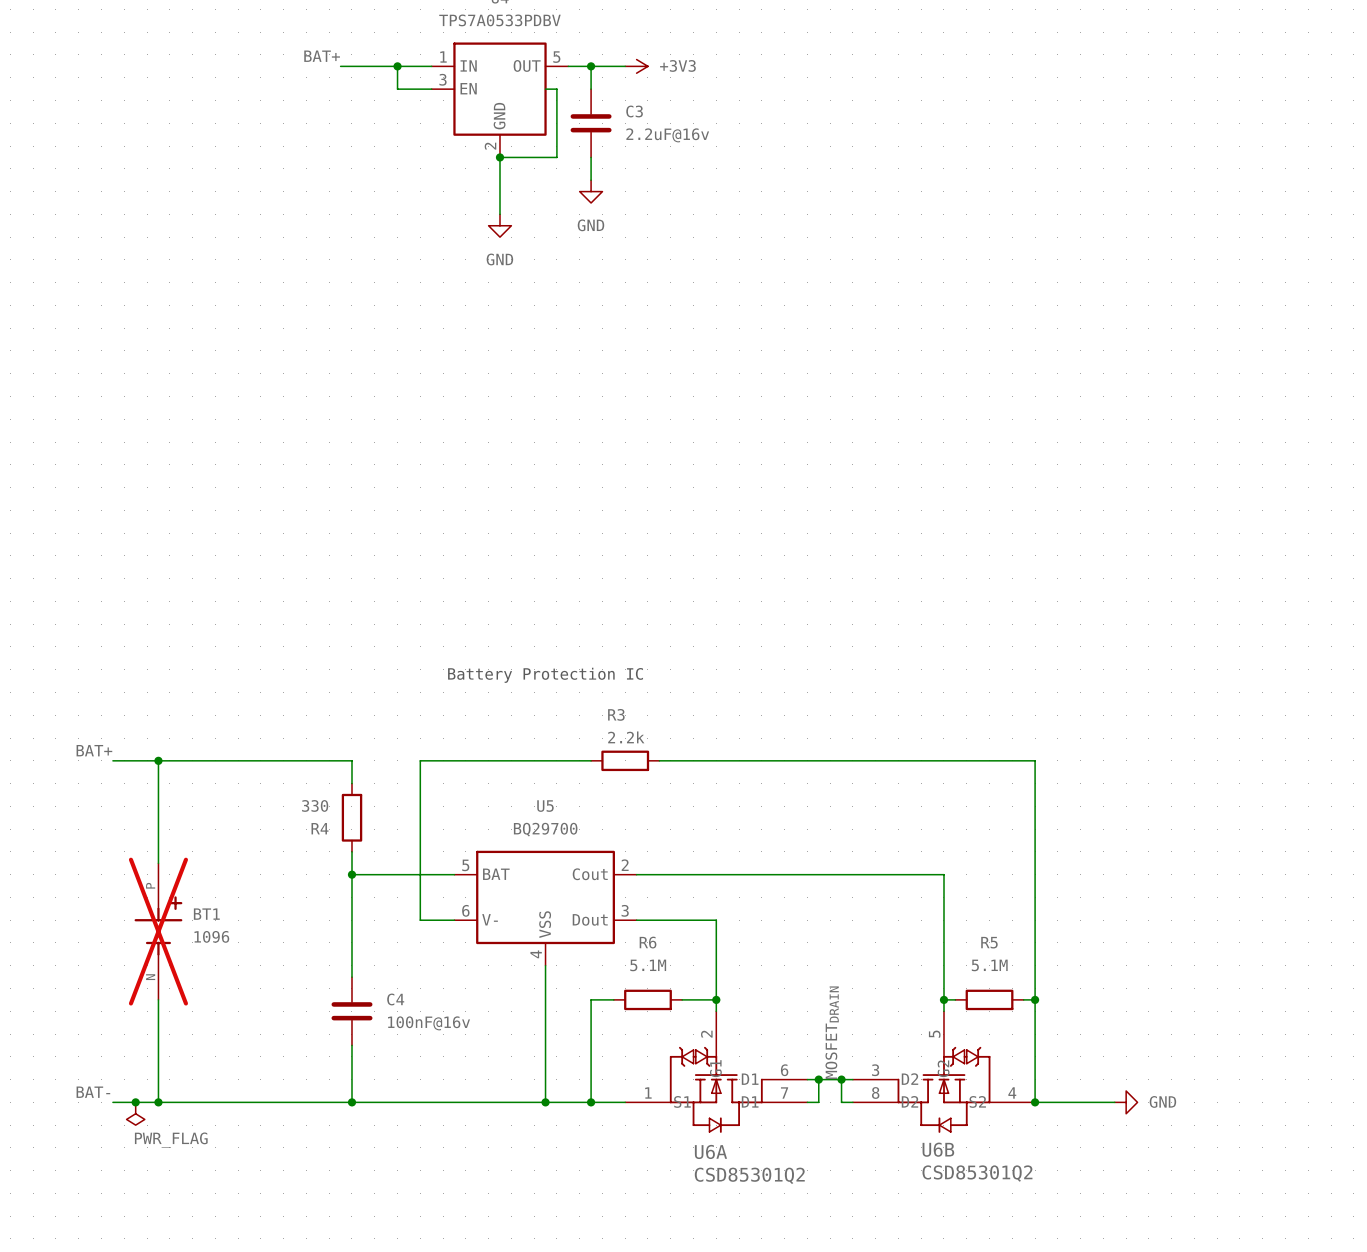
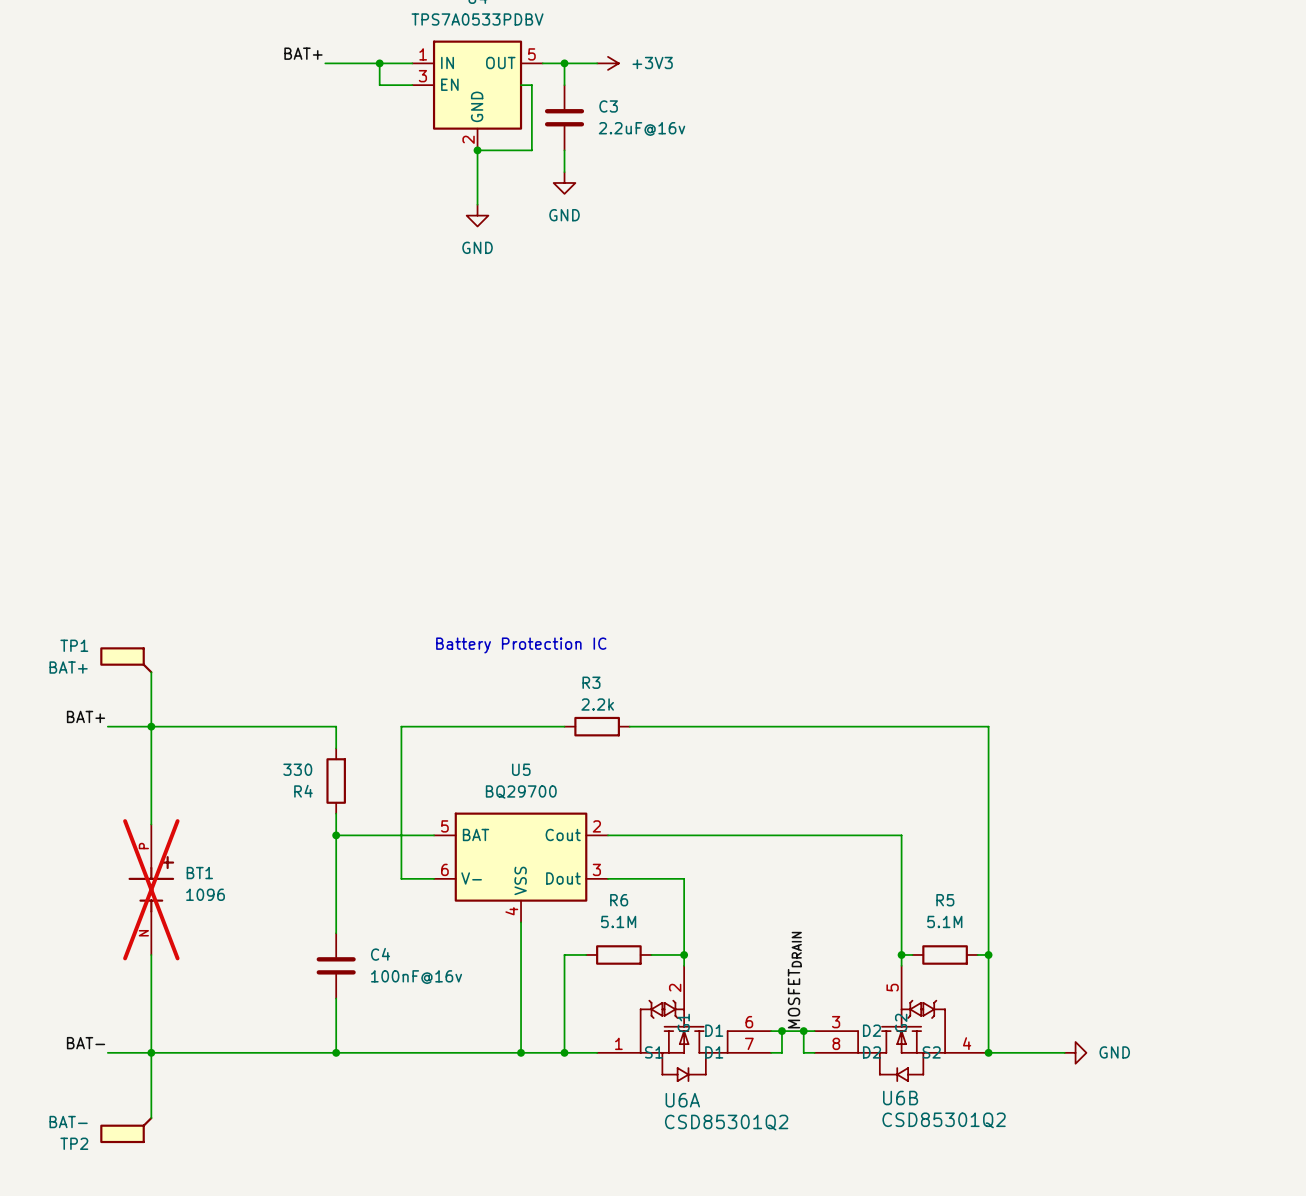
TP1: none -> BAT+ (126, 660)
wire: none -> (151, 672) (151, 726)
junction: (135, 1102) -> none
wire: none -> (151, 1052) (151, 1118)
power symbol: PWR_FLAG (135, 1113) -> none
TP2: none -> BAT- (126, 1130)

